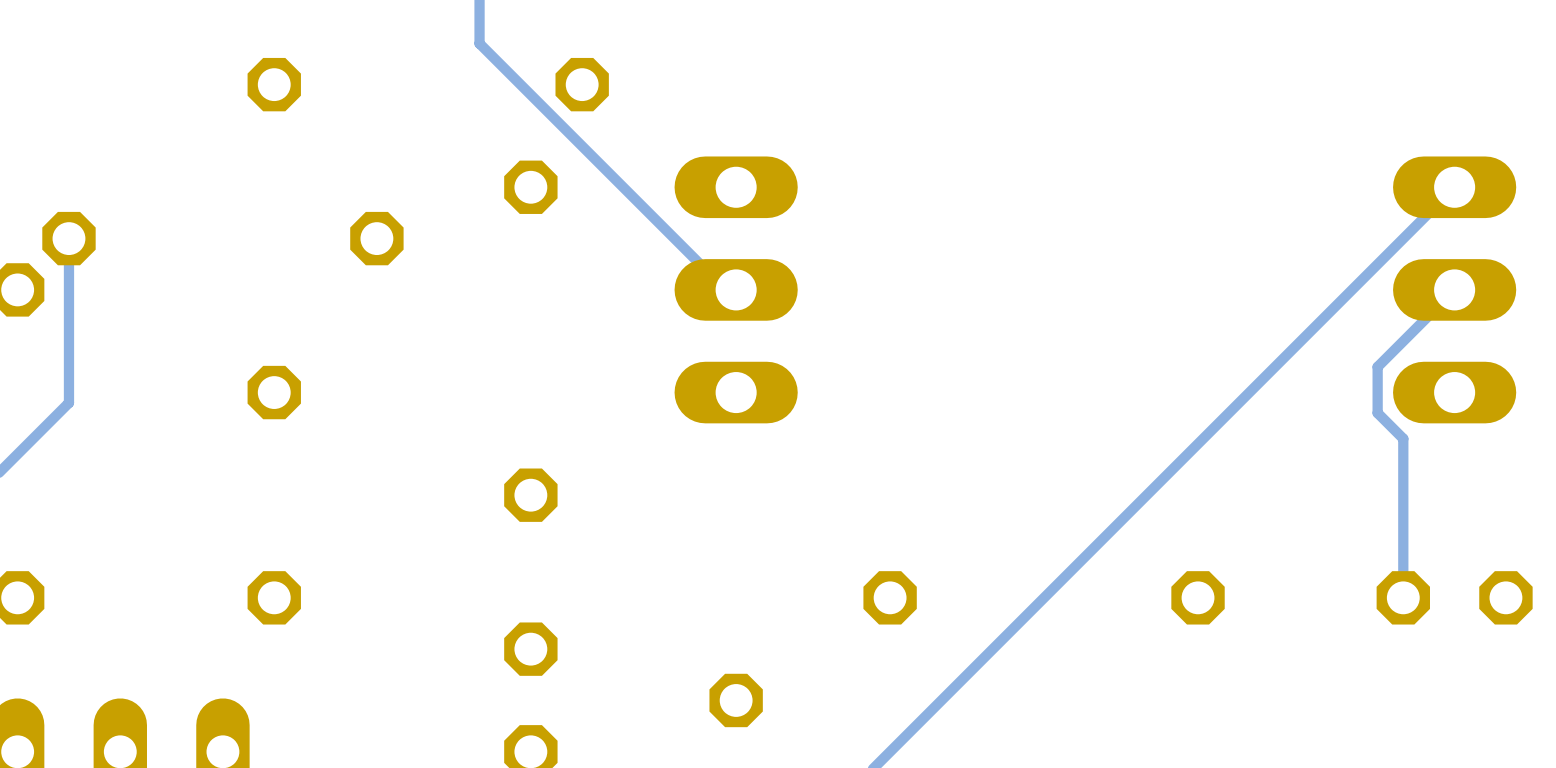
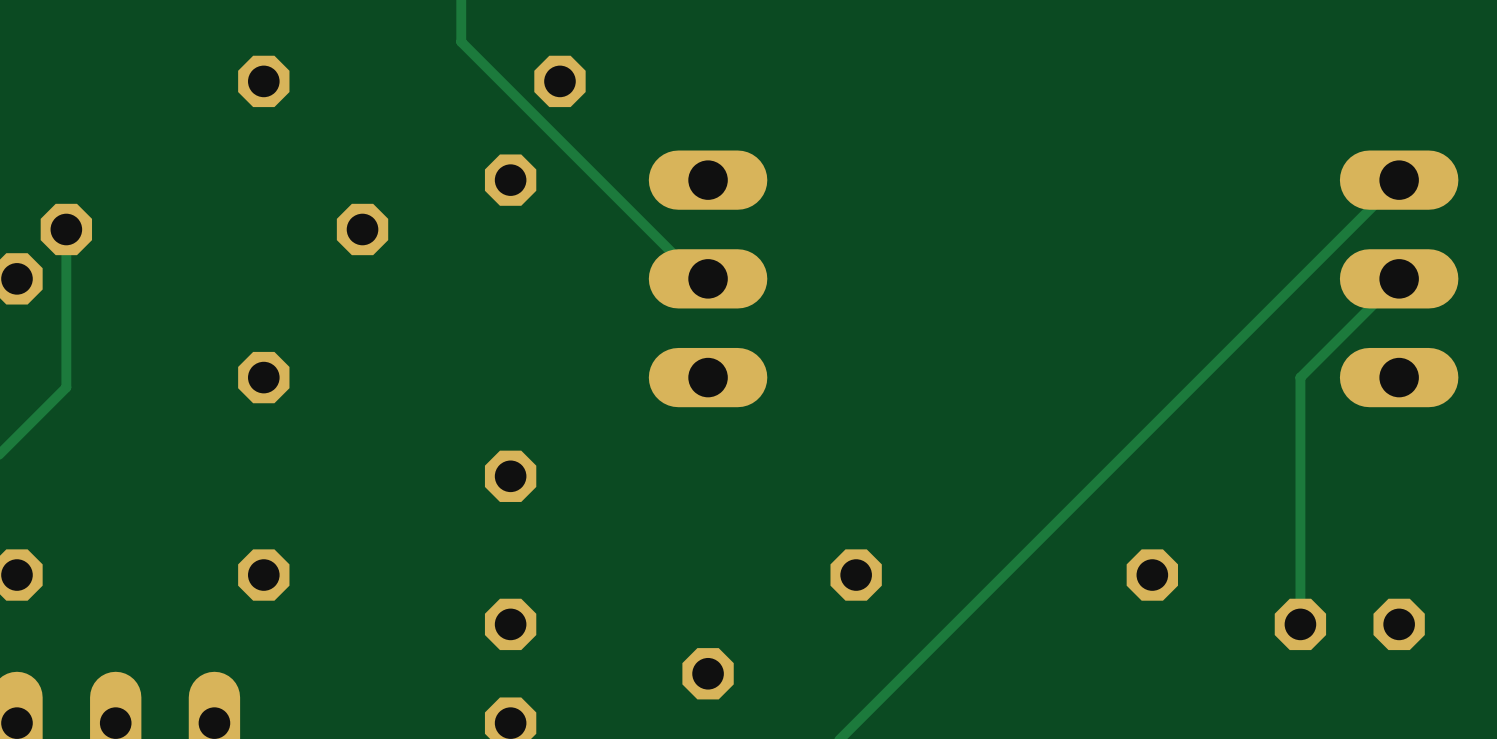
track: (1377, 366) (1377, 413) (1403, 438) (1403, 597) -> (1325, 352) (1300, 377) (1300, 624)
part position: (1454, 597) -> (1349, 624)

